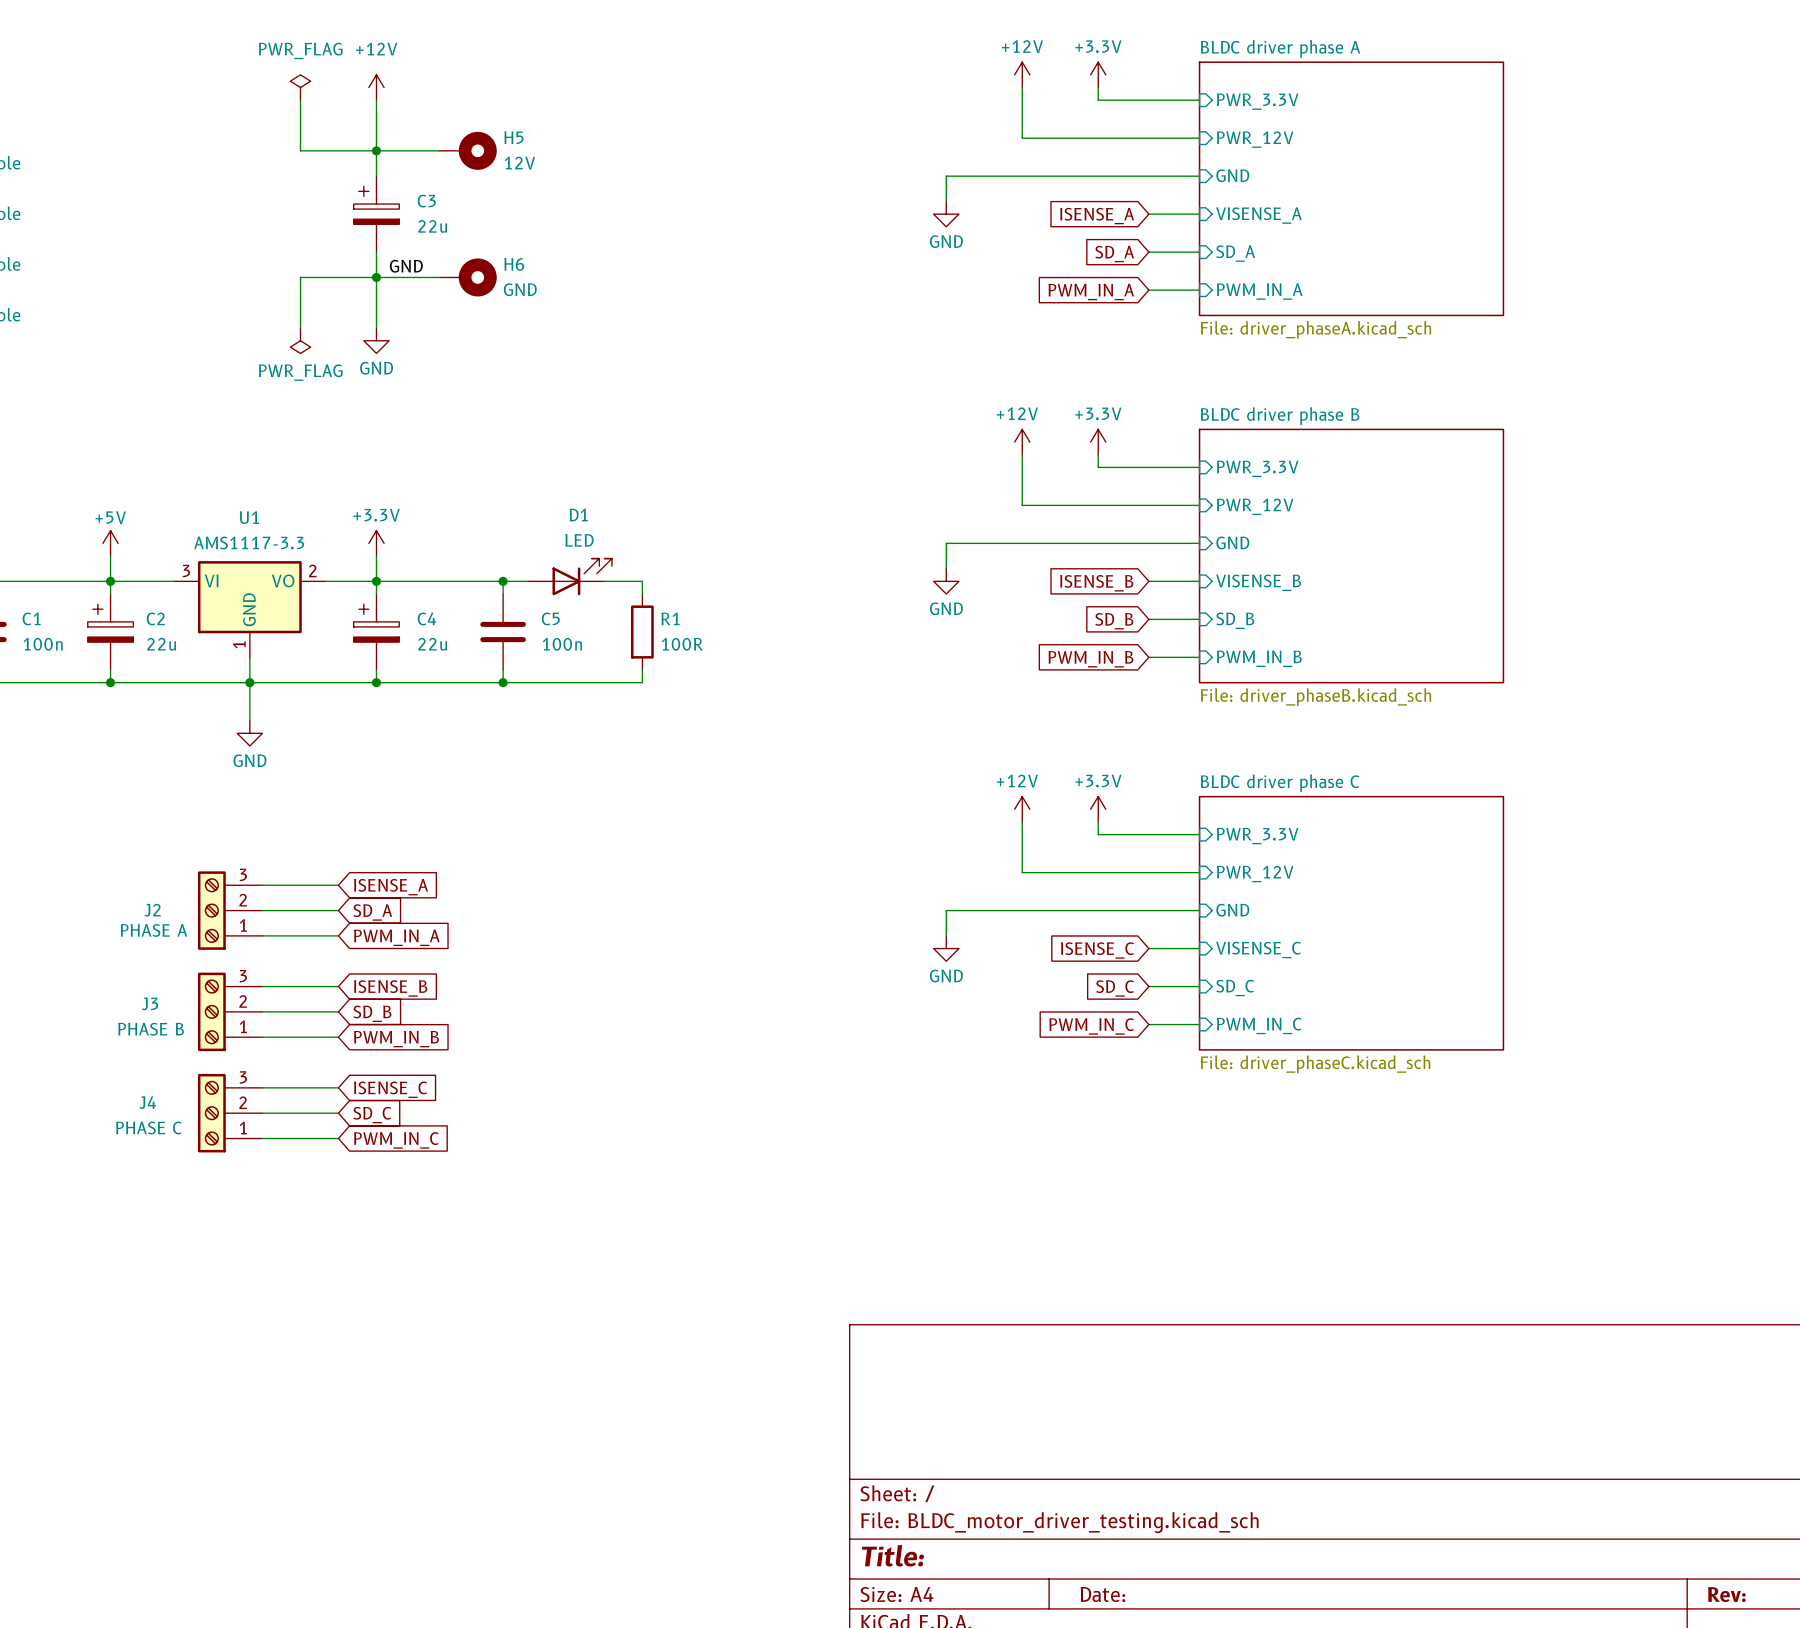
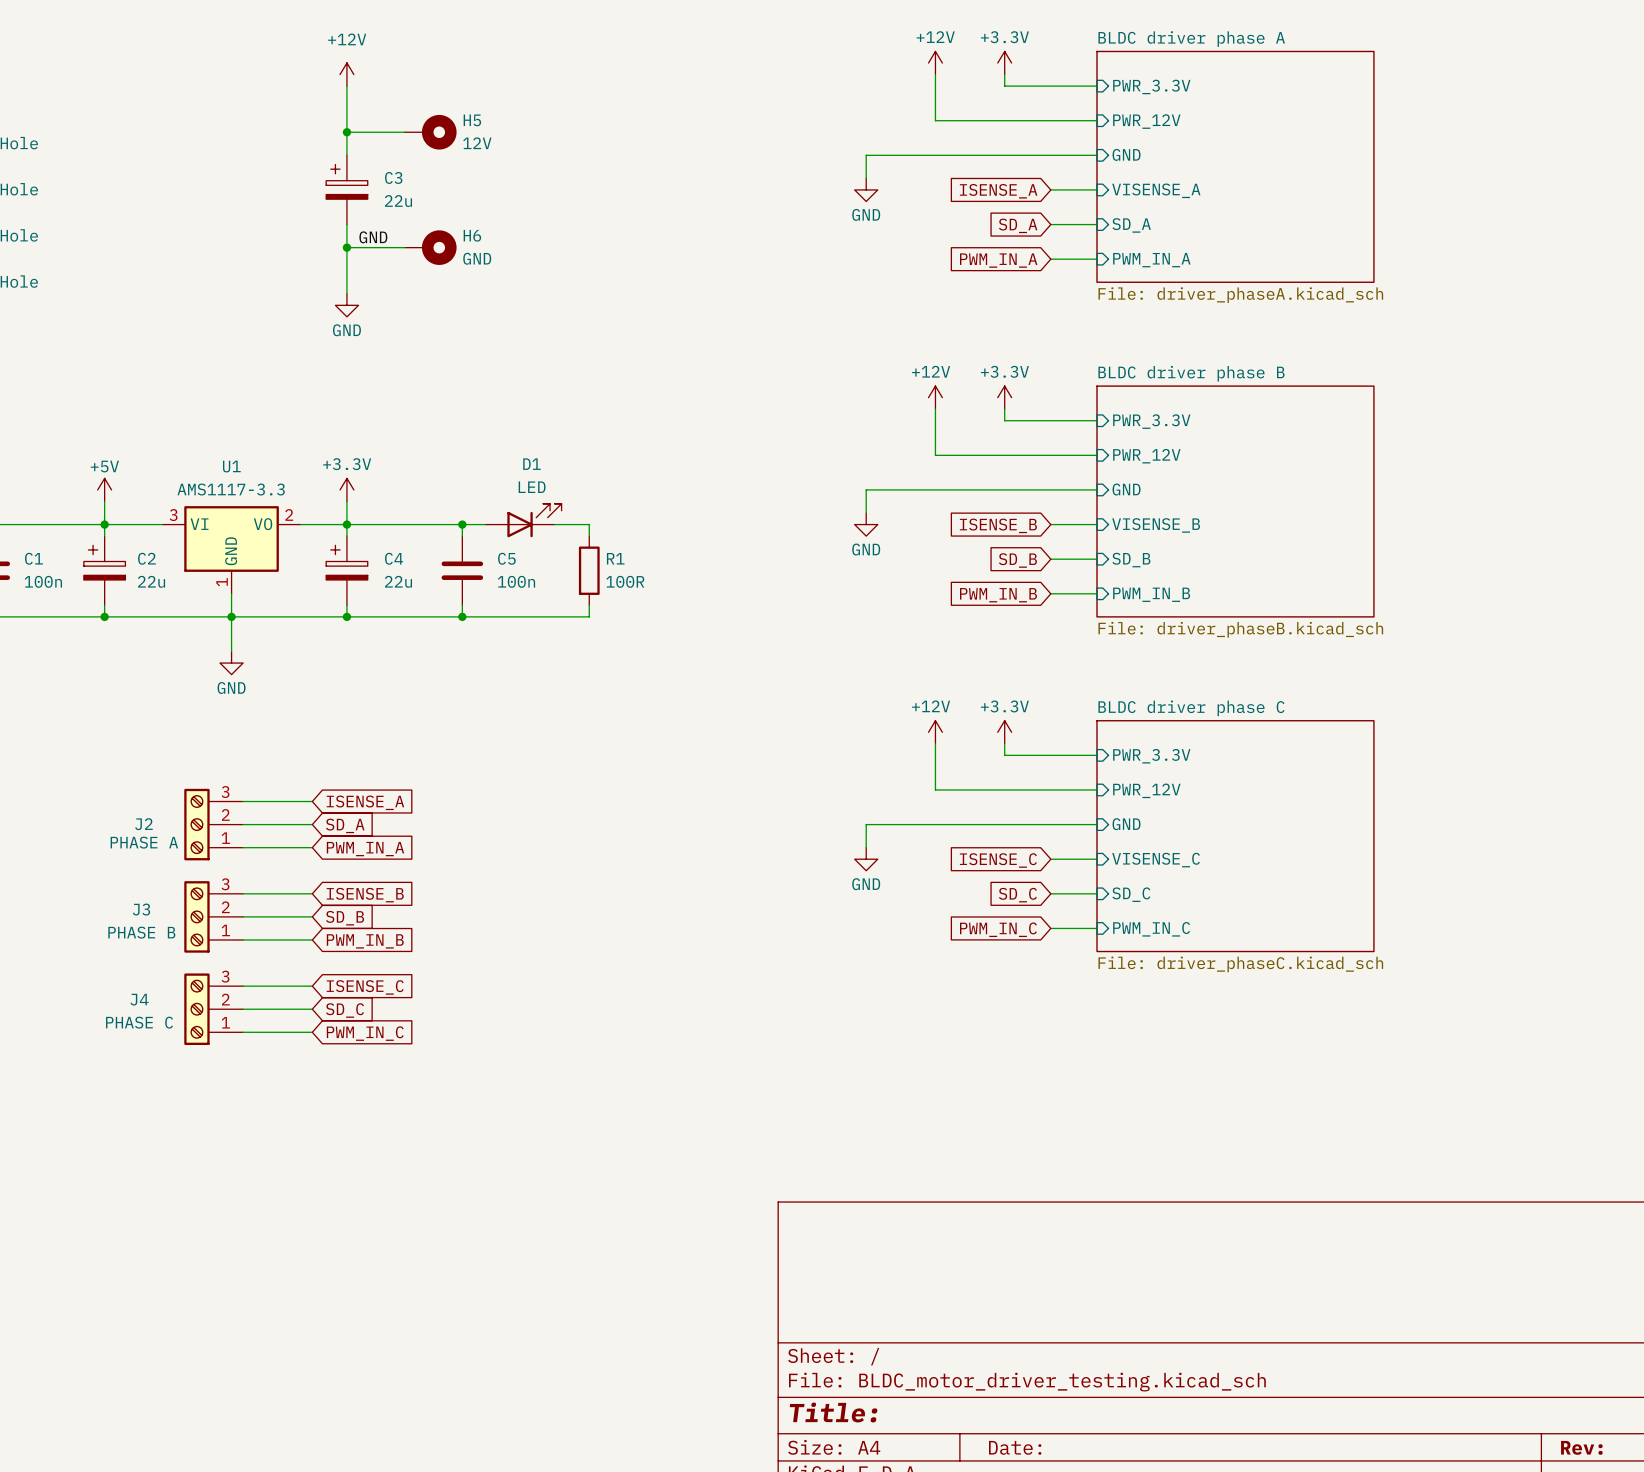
power symbol: PWR_FLAG (300, 87) -> none
wire: (300, 100) (300, 150) (376, 150) -> none
wire: (376, 277) (300, 277) (300, 328) -> none
power symbol: PWR_FLAG (300, 340) -> none

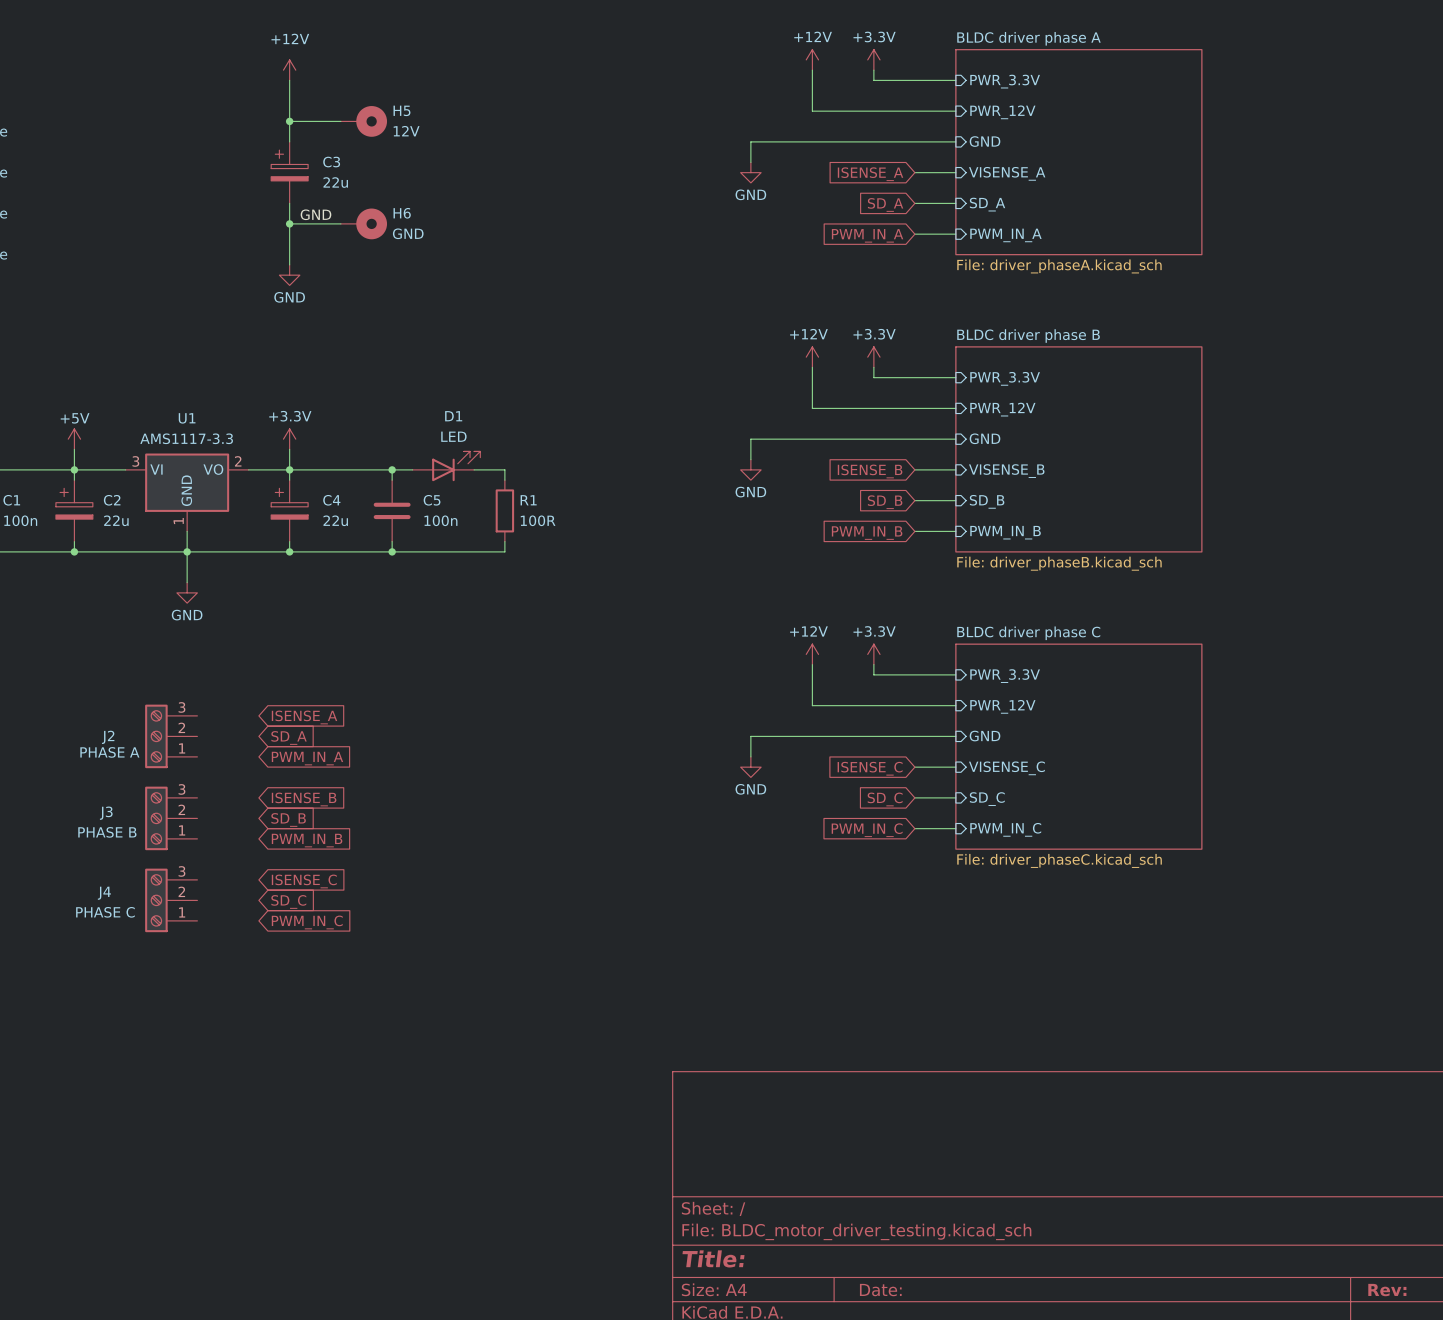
wire: (243, 801) (312, 801) -> none
wire: (243, 824) (312, 824) -> none
wire: (243, 847) (312, 847) -> none
wire: (243, 893) (312, 893) -> none
wire: (243, 916) (312, 916) -> none
wire: (243, 939) (312, 939) -> none
wire: (243, 986) (312, 986) -> none
wire: (243, 1009) (312, 1009) -> none
wire: (243, 1032) (312, 1032) -> none

